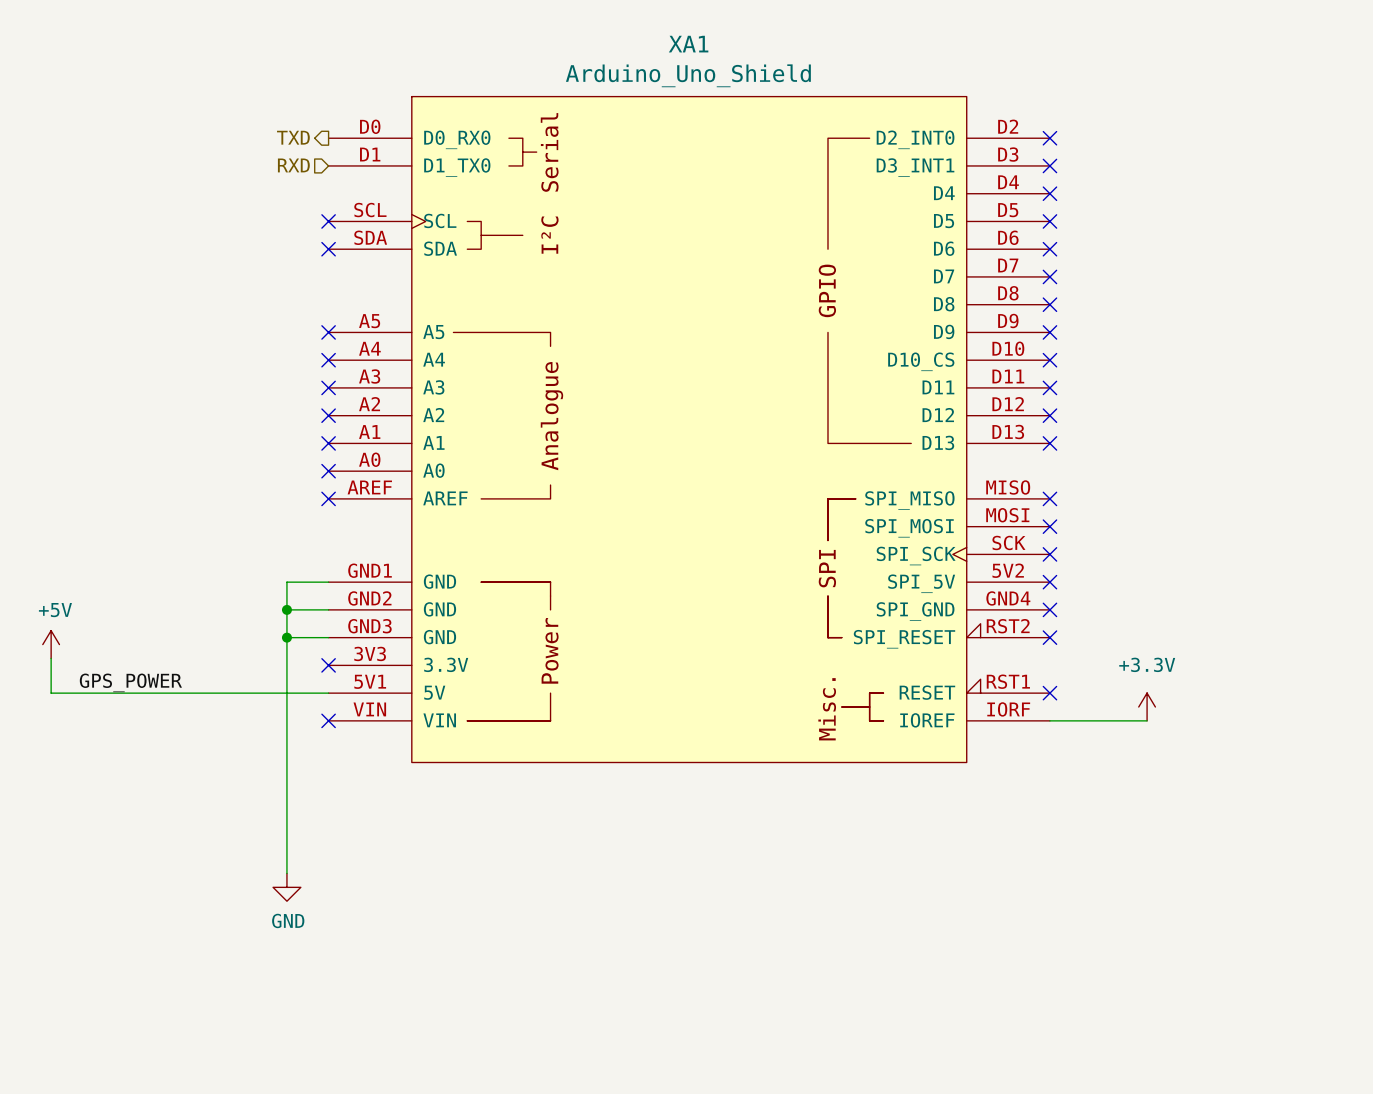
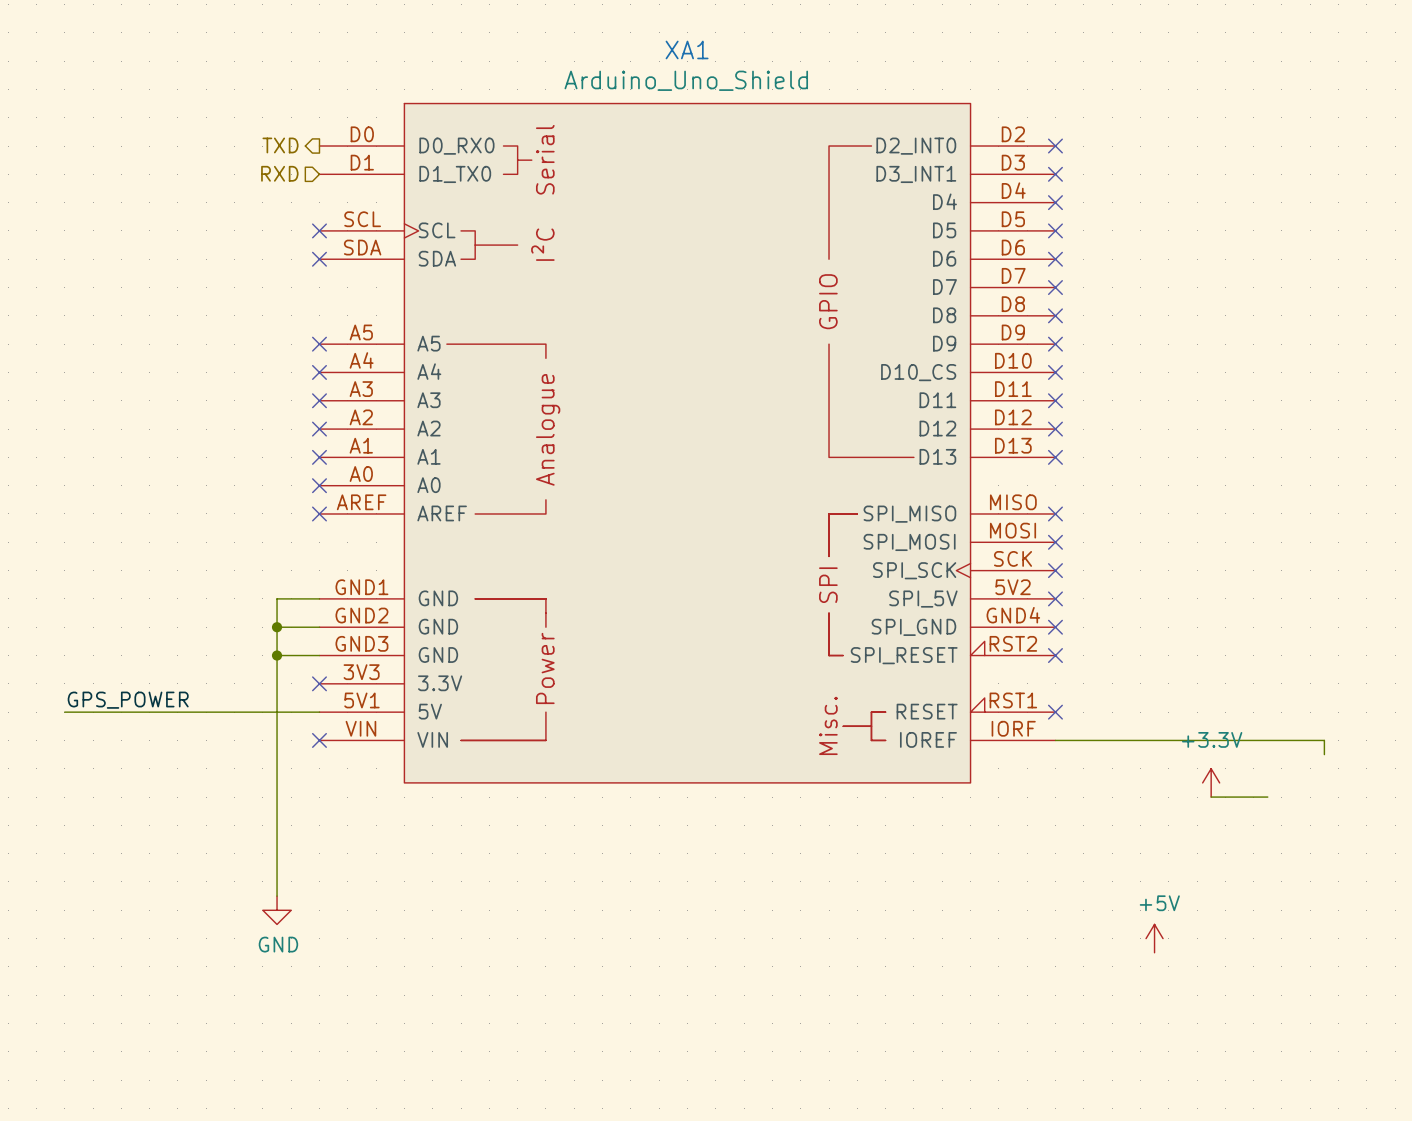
power symbol: +5V (51, 644) -> none
wire: (51, 658) (51, 693) (78, 693) -> none
power symbol position: +3.3V (1147, 707) -> +3.3V (1211, 782)
wire: none -> (1154, 740) (1324, 740) (1324, 754)
wire: none -> (1211, 797) (1267, 797)
power symbol: none -> +5V (1154, 938)

